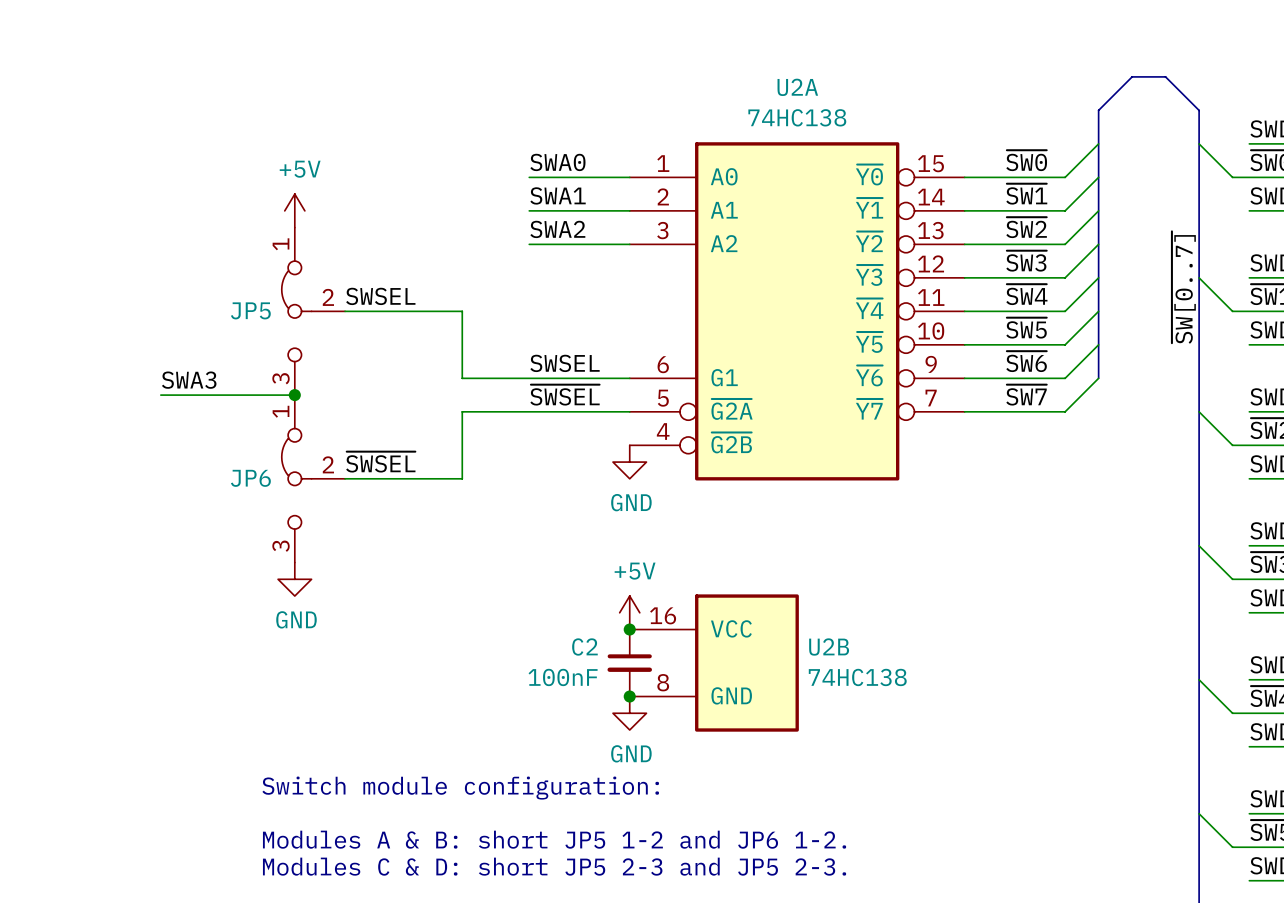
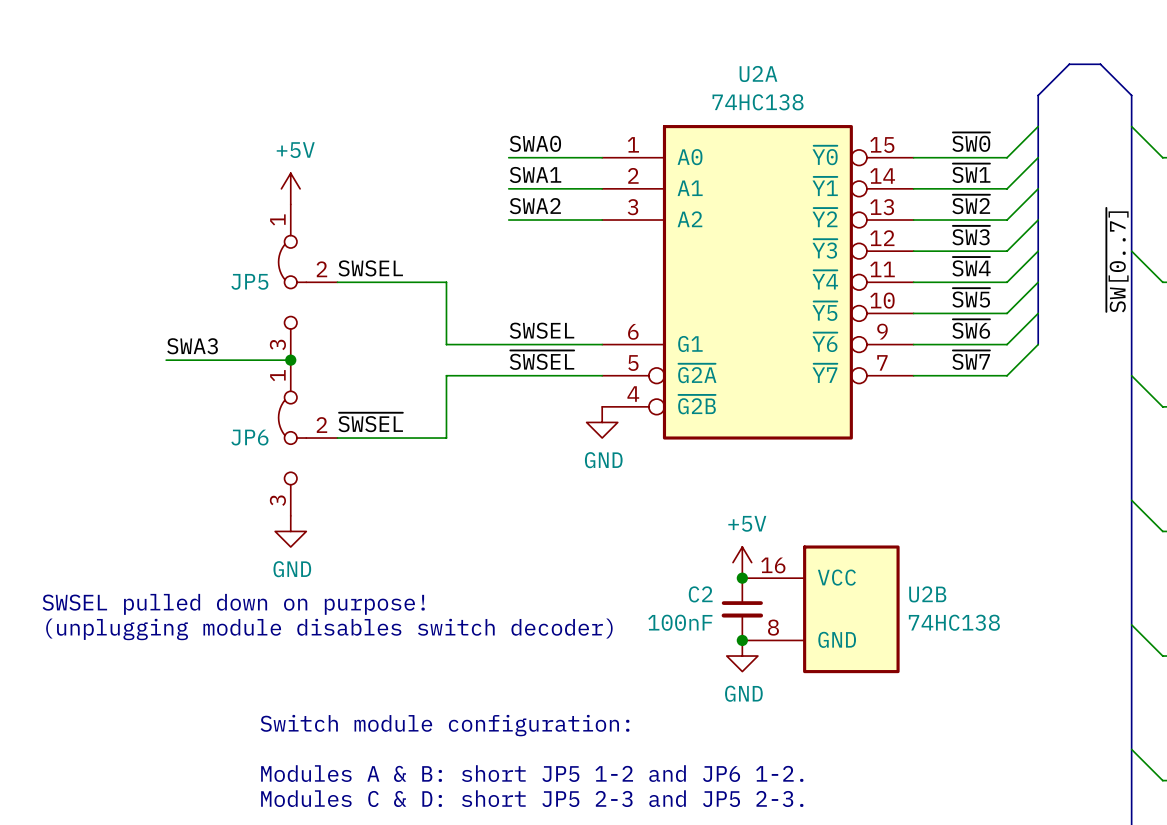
power symbol position: +5V (629, 612) -> +5V (742, 562)
junction: (629, 629) -> none
junction: none -> (742, 578)
text: none -> SWSEL pulled down on purpose! (233, 604)
C2 position: (629, 663) -> (742, 609)
U2B position: (714, 663) -> (820, 609)
text: none -> (unplugging module disables switch decoder) (329, 629)
junction: (629, 696) -> none
junction: none -> (742, 640)
power symbol position: GND (629, 713) -> GND (742, 656)

